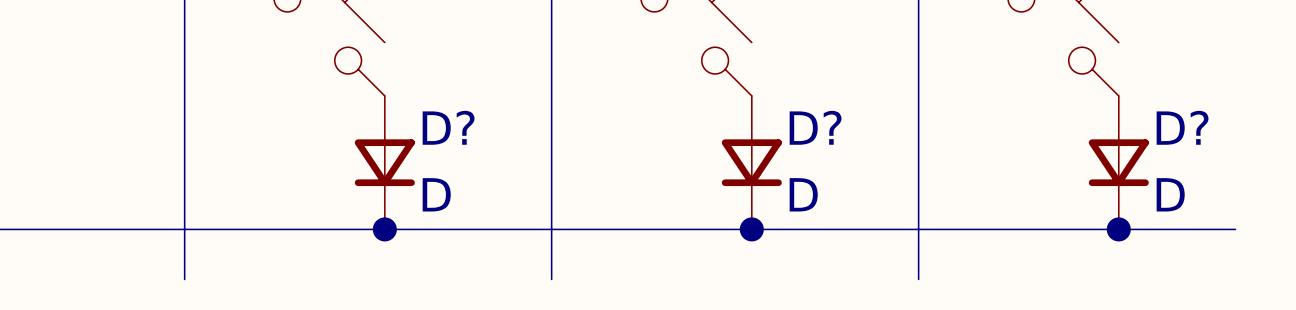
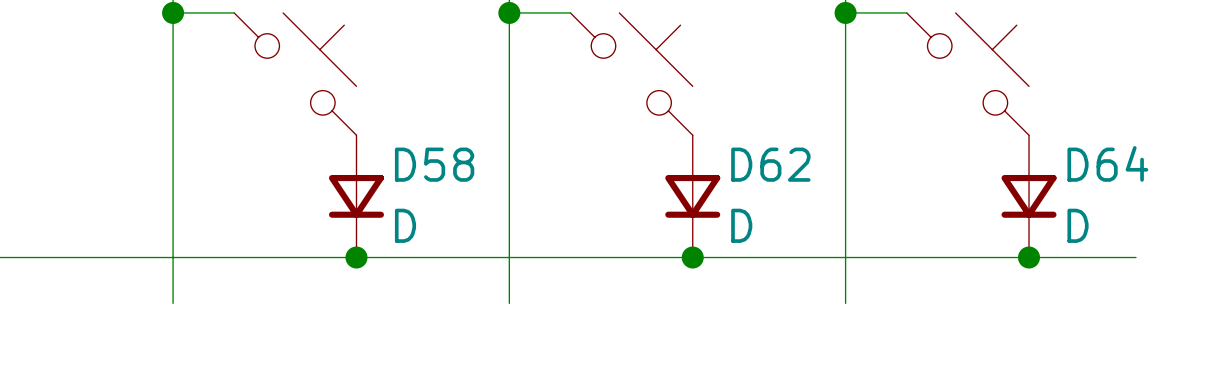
D? name: D? (448, 127) -> D58 (434, 164)
D? name: D? (815, 127) -> D62 (770, 164)
D? name: D? (1182, 127) -> D64 (1107, 163)

